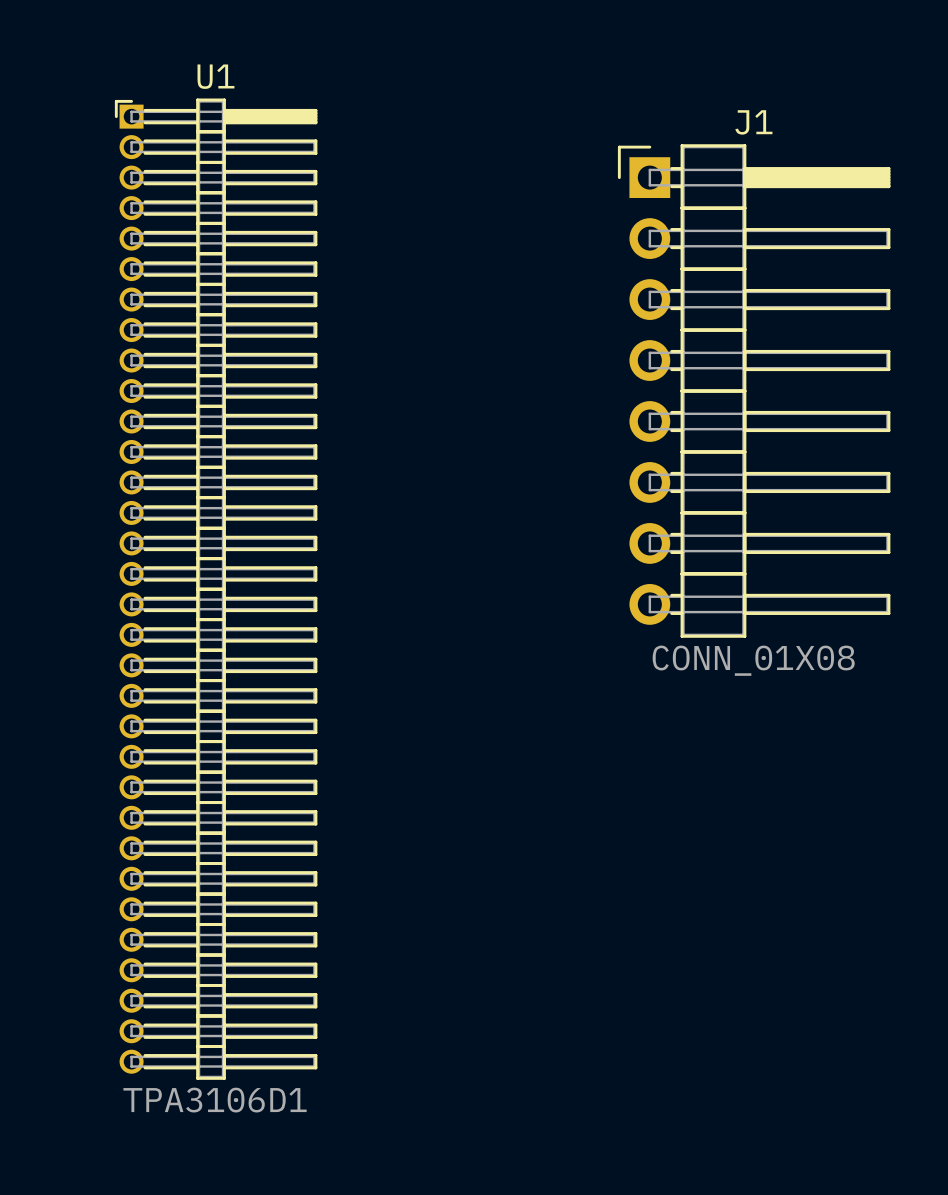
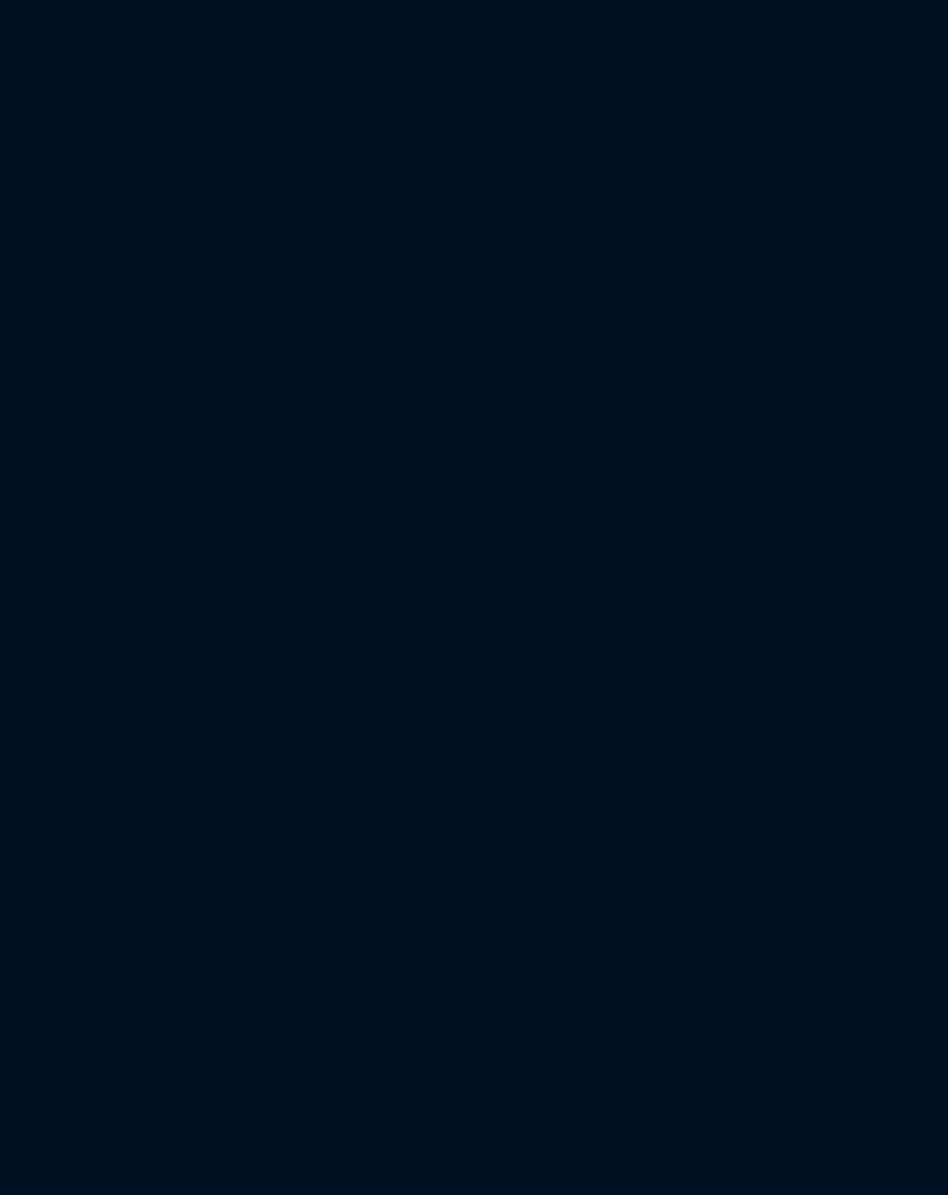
J1: CONN_01X08 (754, 391) -> none
U1: TPA3106D1 (216, 589) -> none

